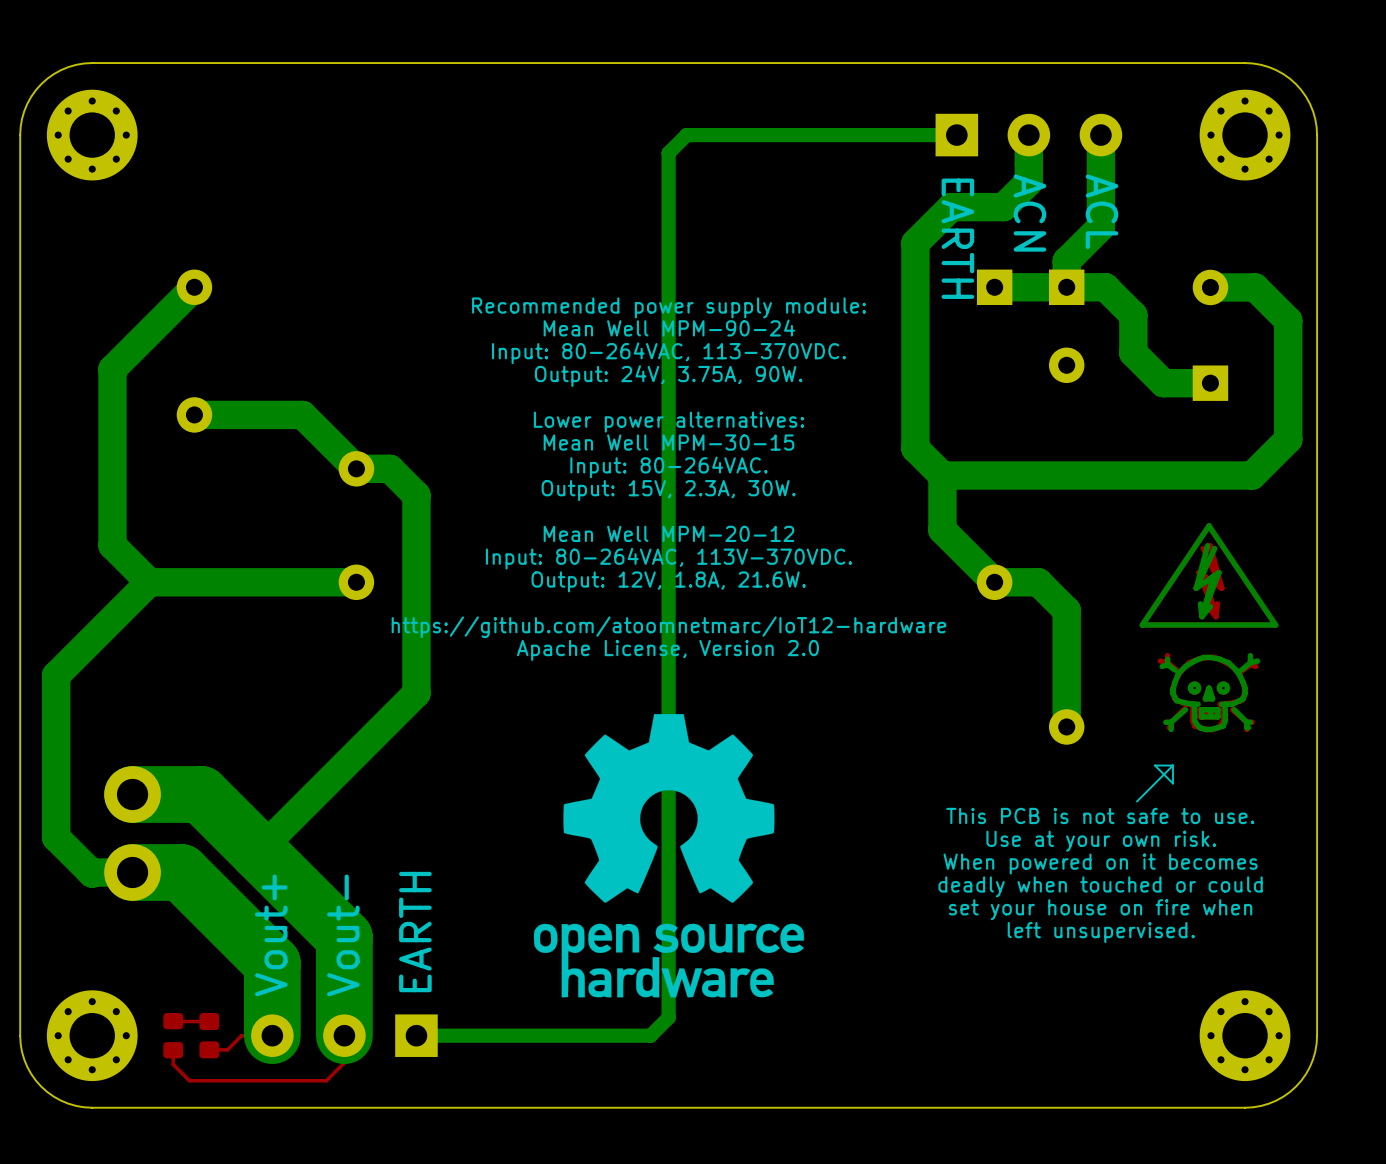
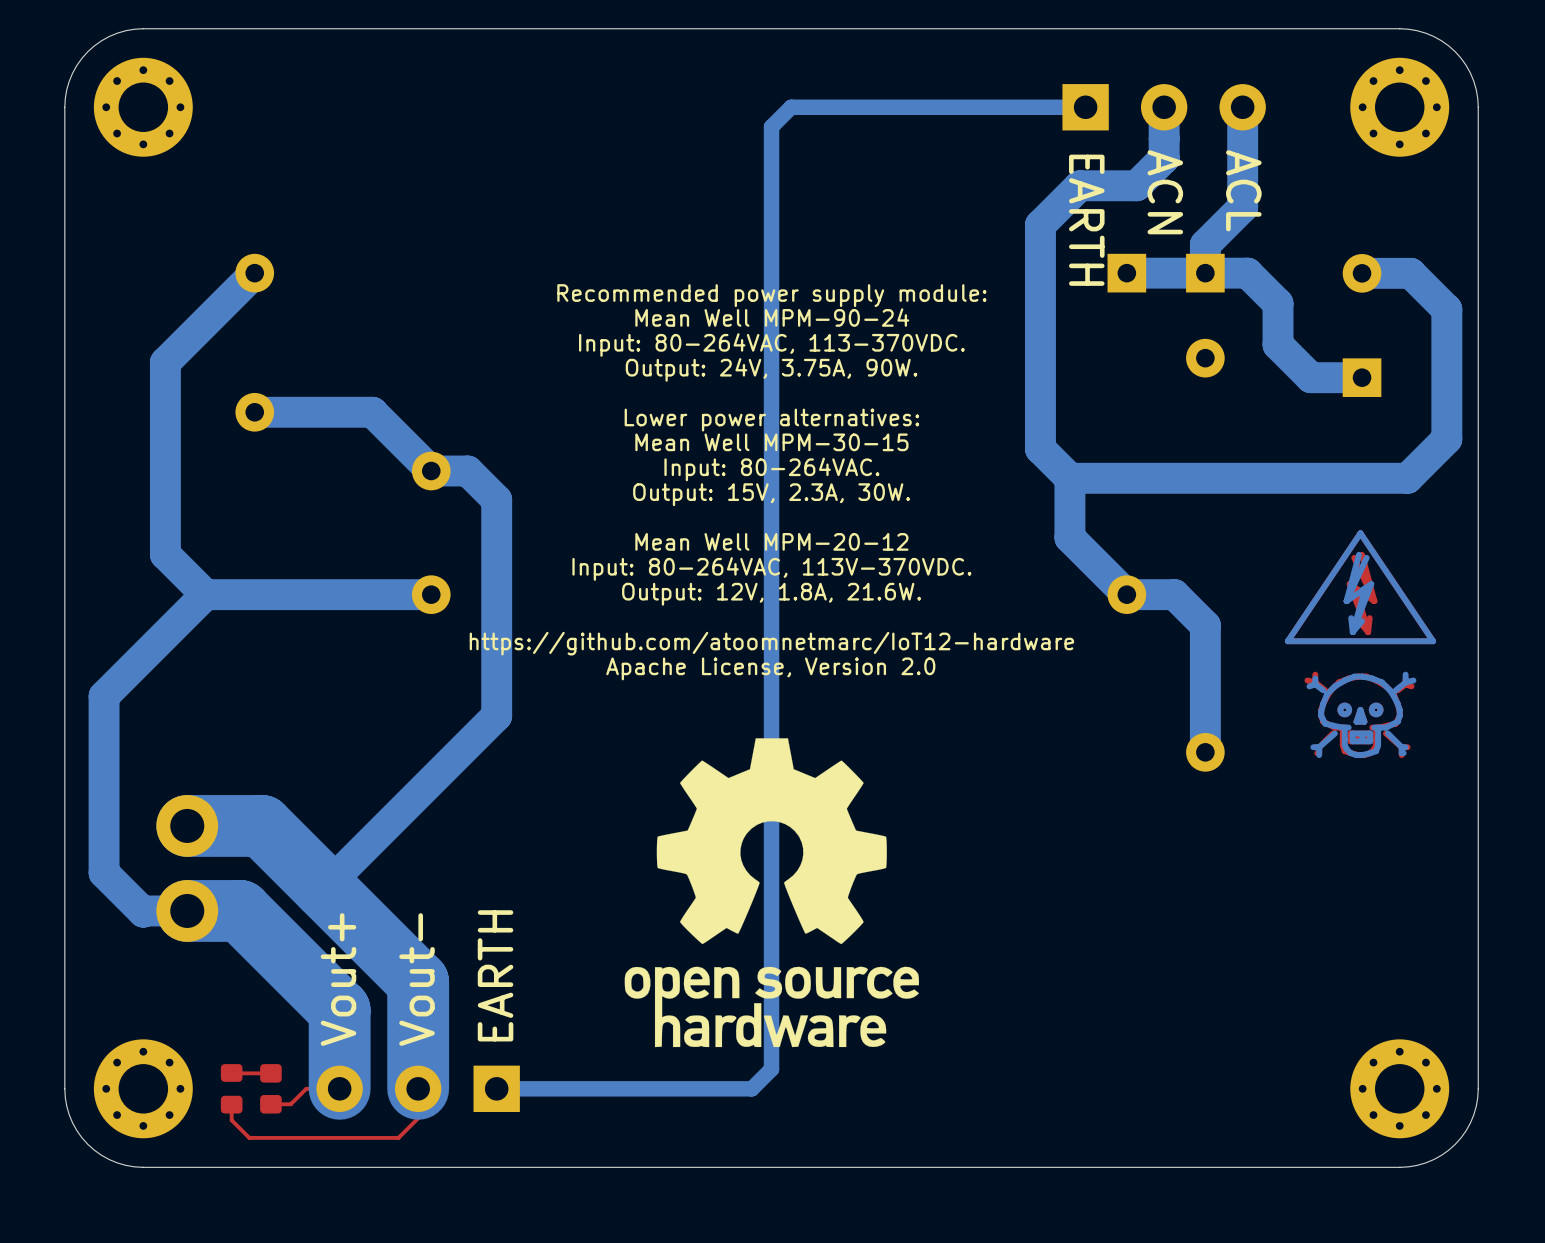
line: (1172, 765) (1136, 801) -> none
line: (1172, 765) (1154, 765) (1172, 783) (1172, 765) -> none
text: This PCB is not safe to use. (1100, 815) -> none
text: Use at your own risk. (1101, 841) -> none
text: When powered on it becomes (1100, 864) -> none
text: deadly when touched or could (1100, 886) -> none
text: set your house on fire when (1100, 909) -> none
text: left unsupervised. (1101, 932) -> none

